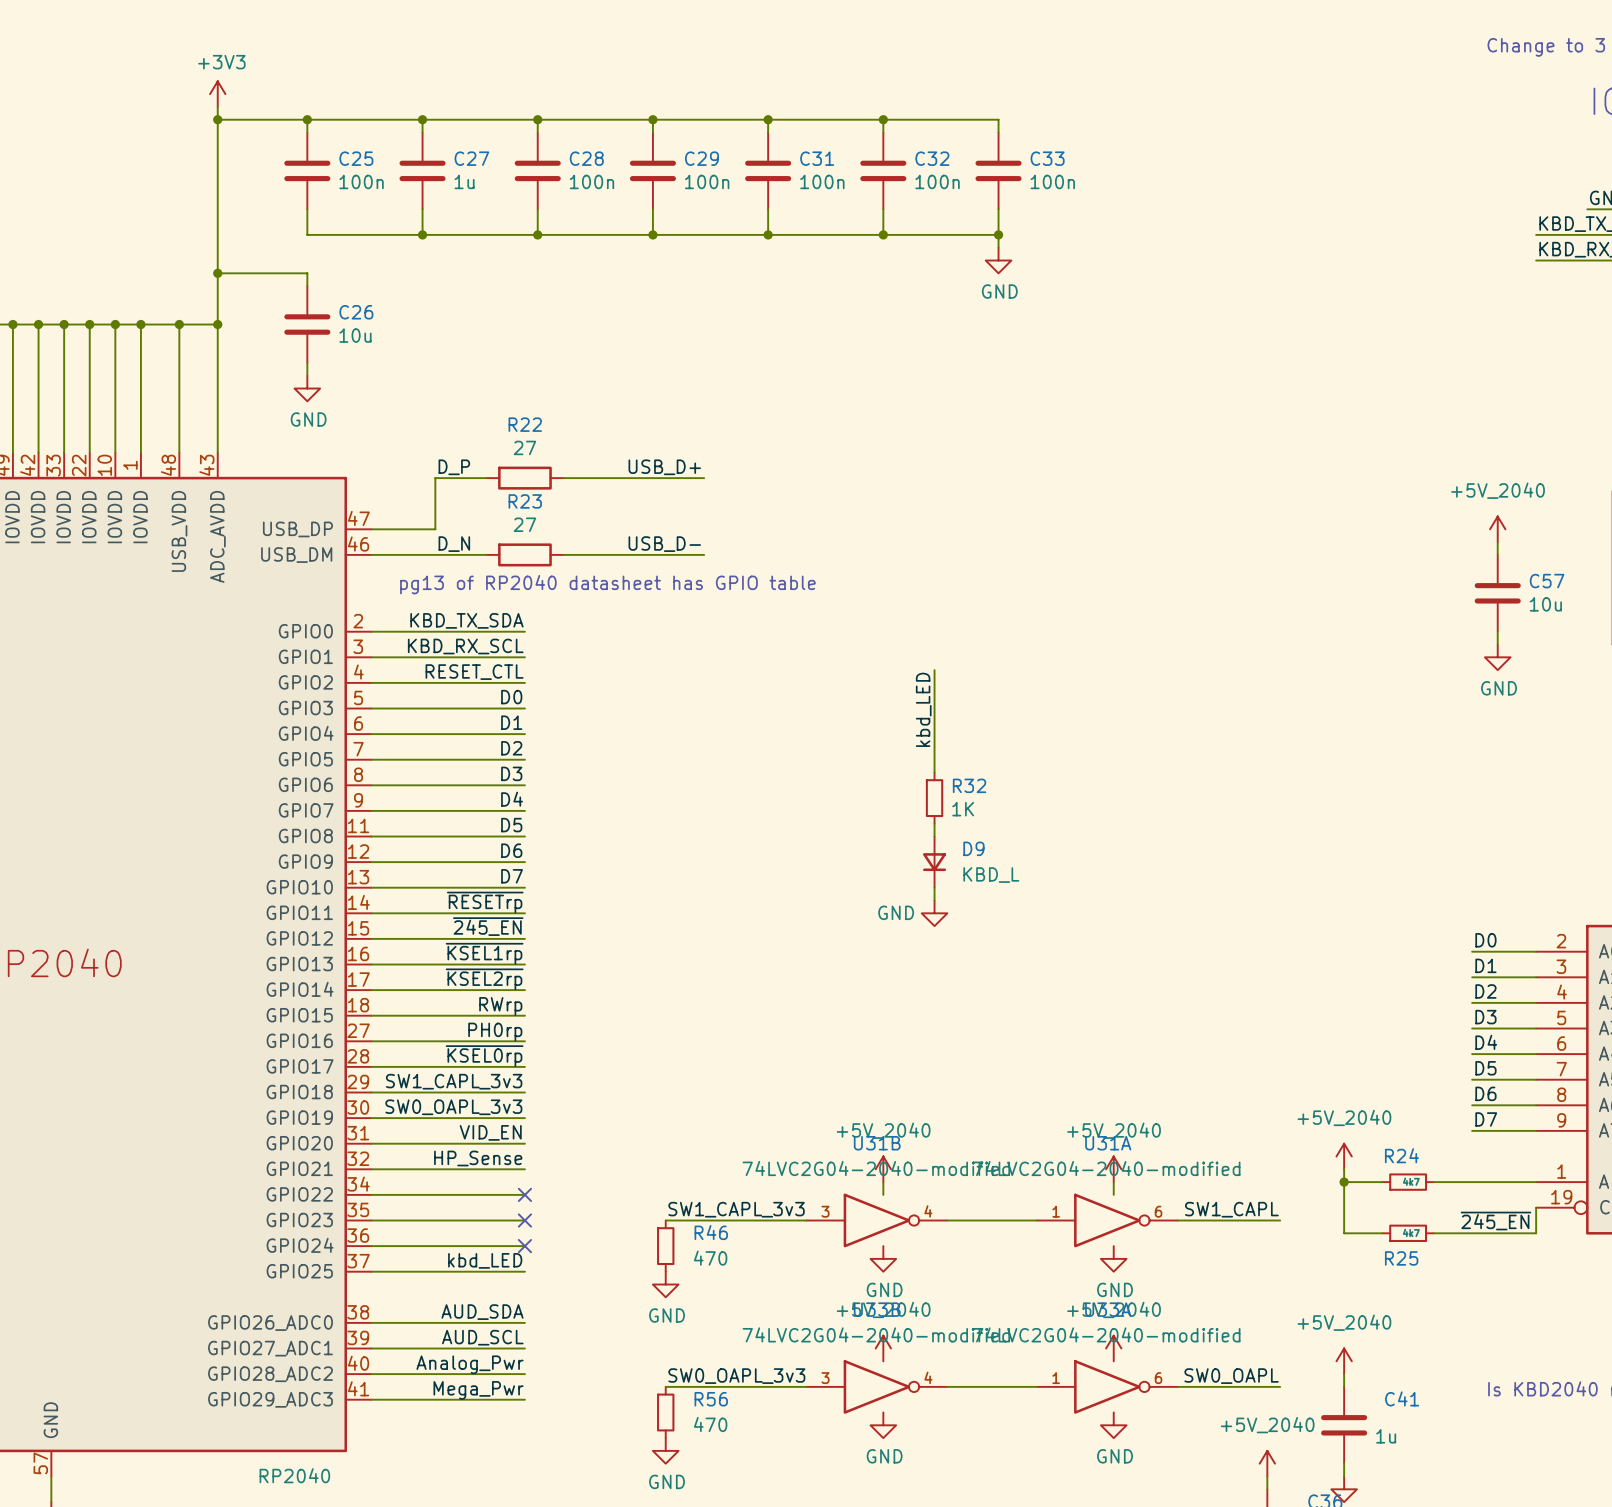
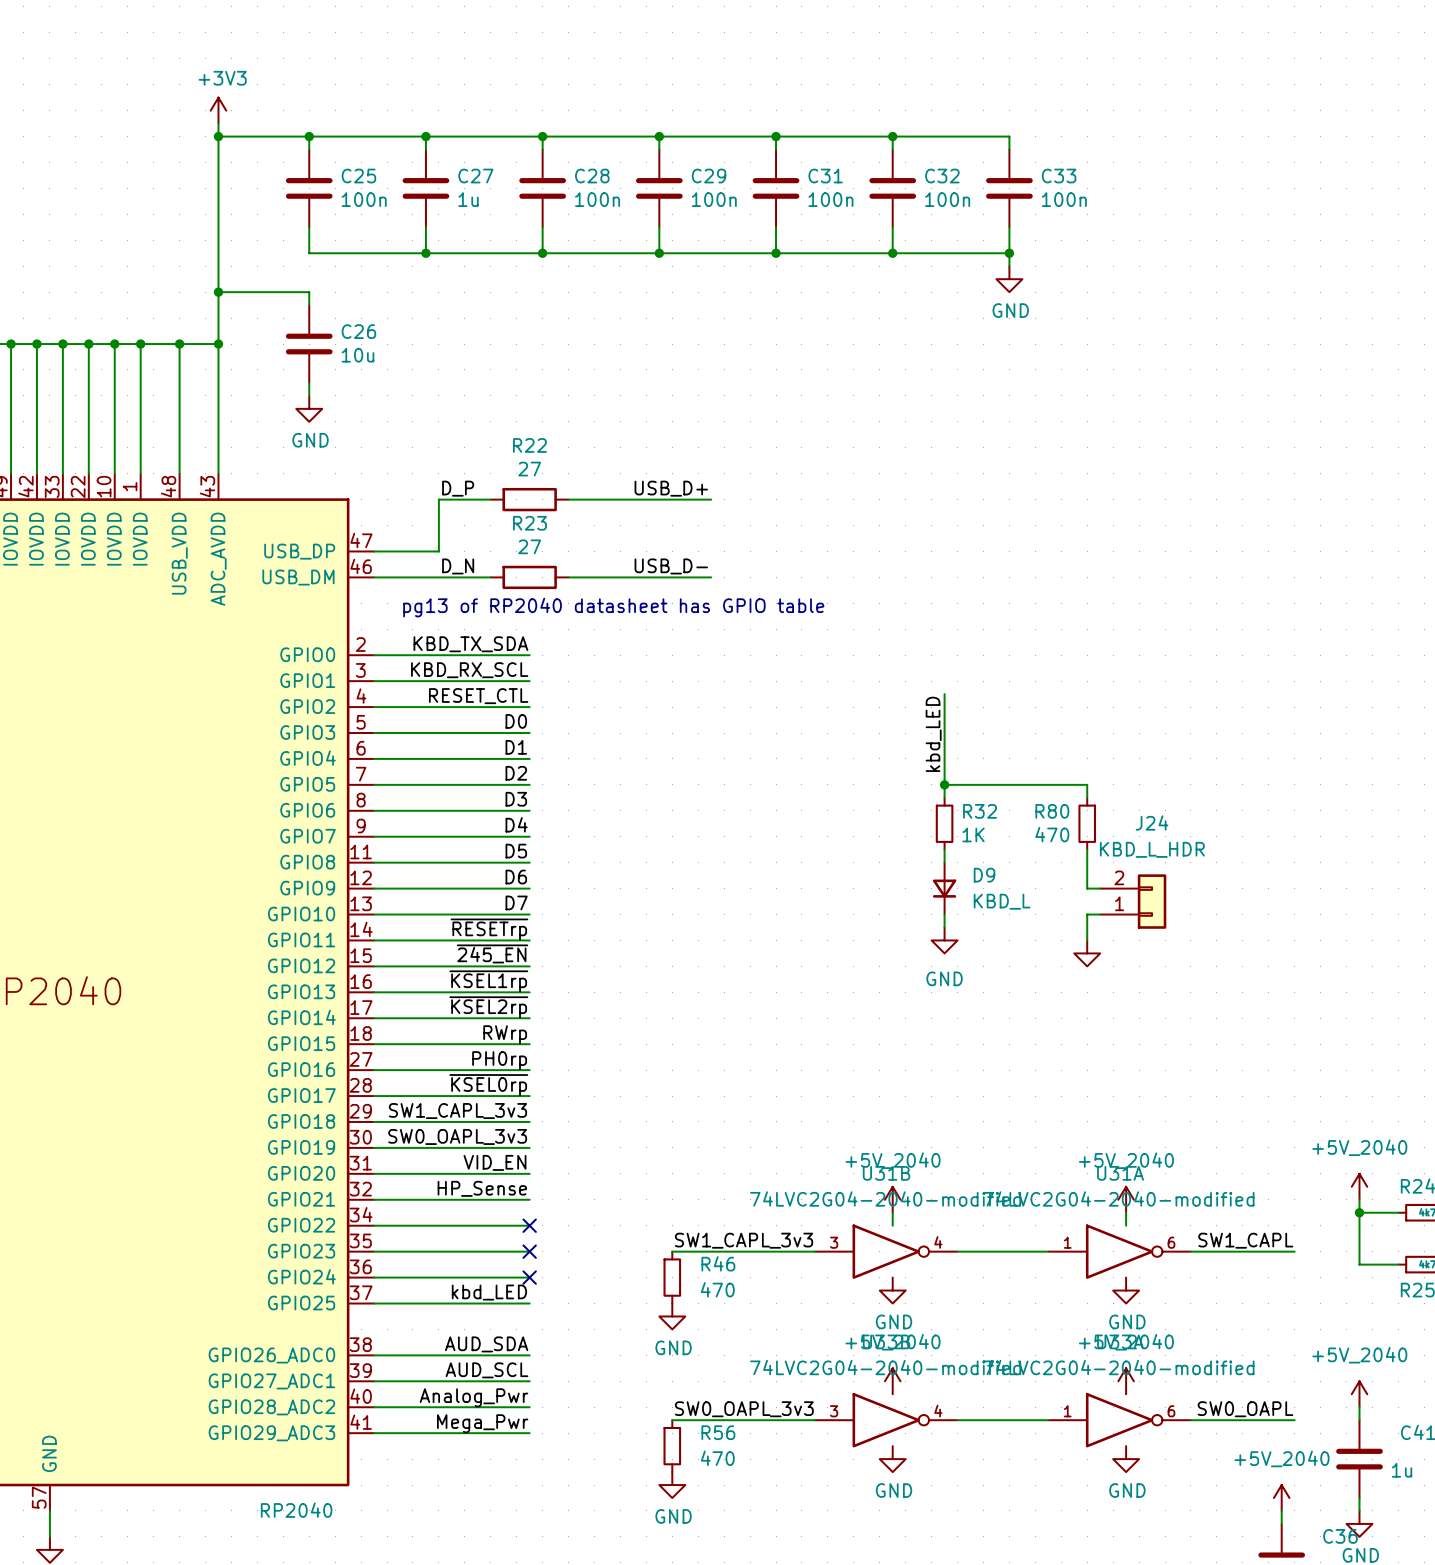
wire: none -> (944, 784) (1087, 784) (1087, 797)
junction: none -> (944, 784)
R80: none -> 470 (1087, 823)
wire: none -> (1087, 849) (1087, 888) (1100, 888)
J24: none -> KBD_L_HDR (1133, 901)
wire: none -> (1100, 914) (1087, 914) (1087, 940)
power symbol text position: GND (896, 912) -> GND (944, 978)
power symbol: none -> (1087, 953)

